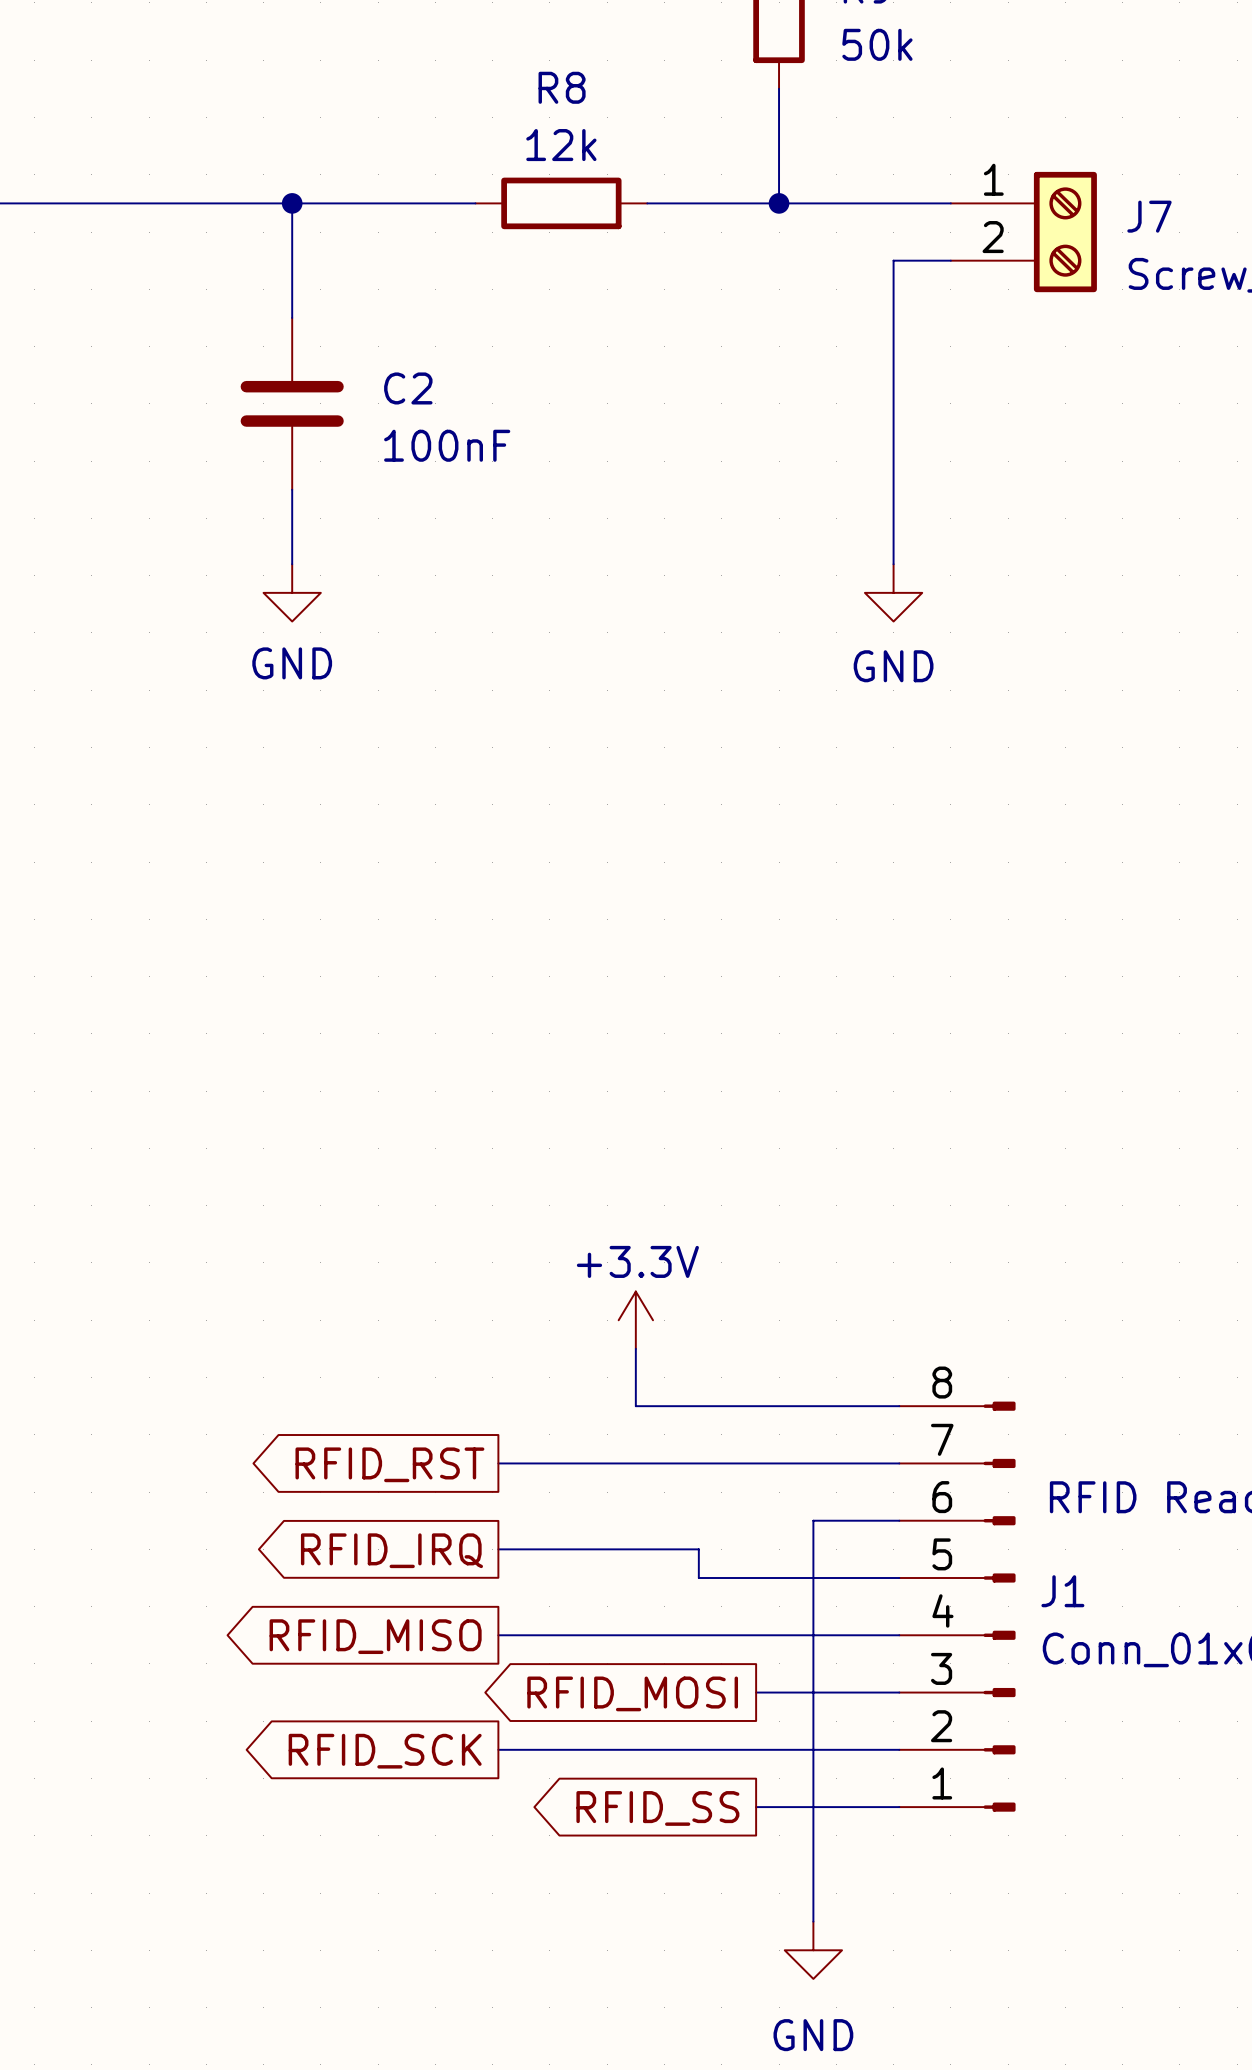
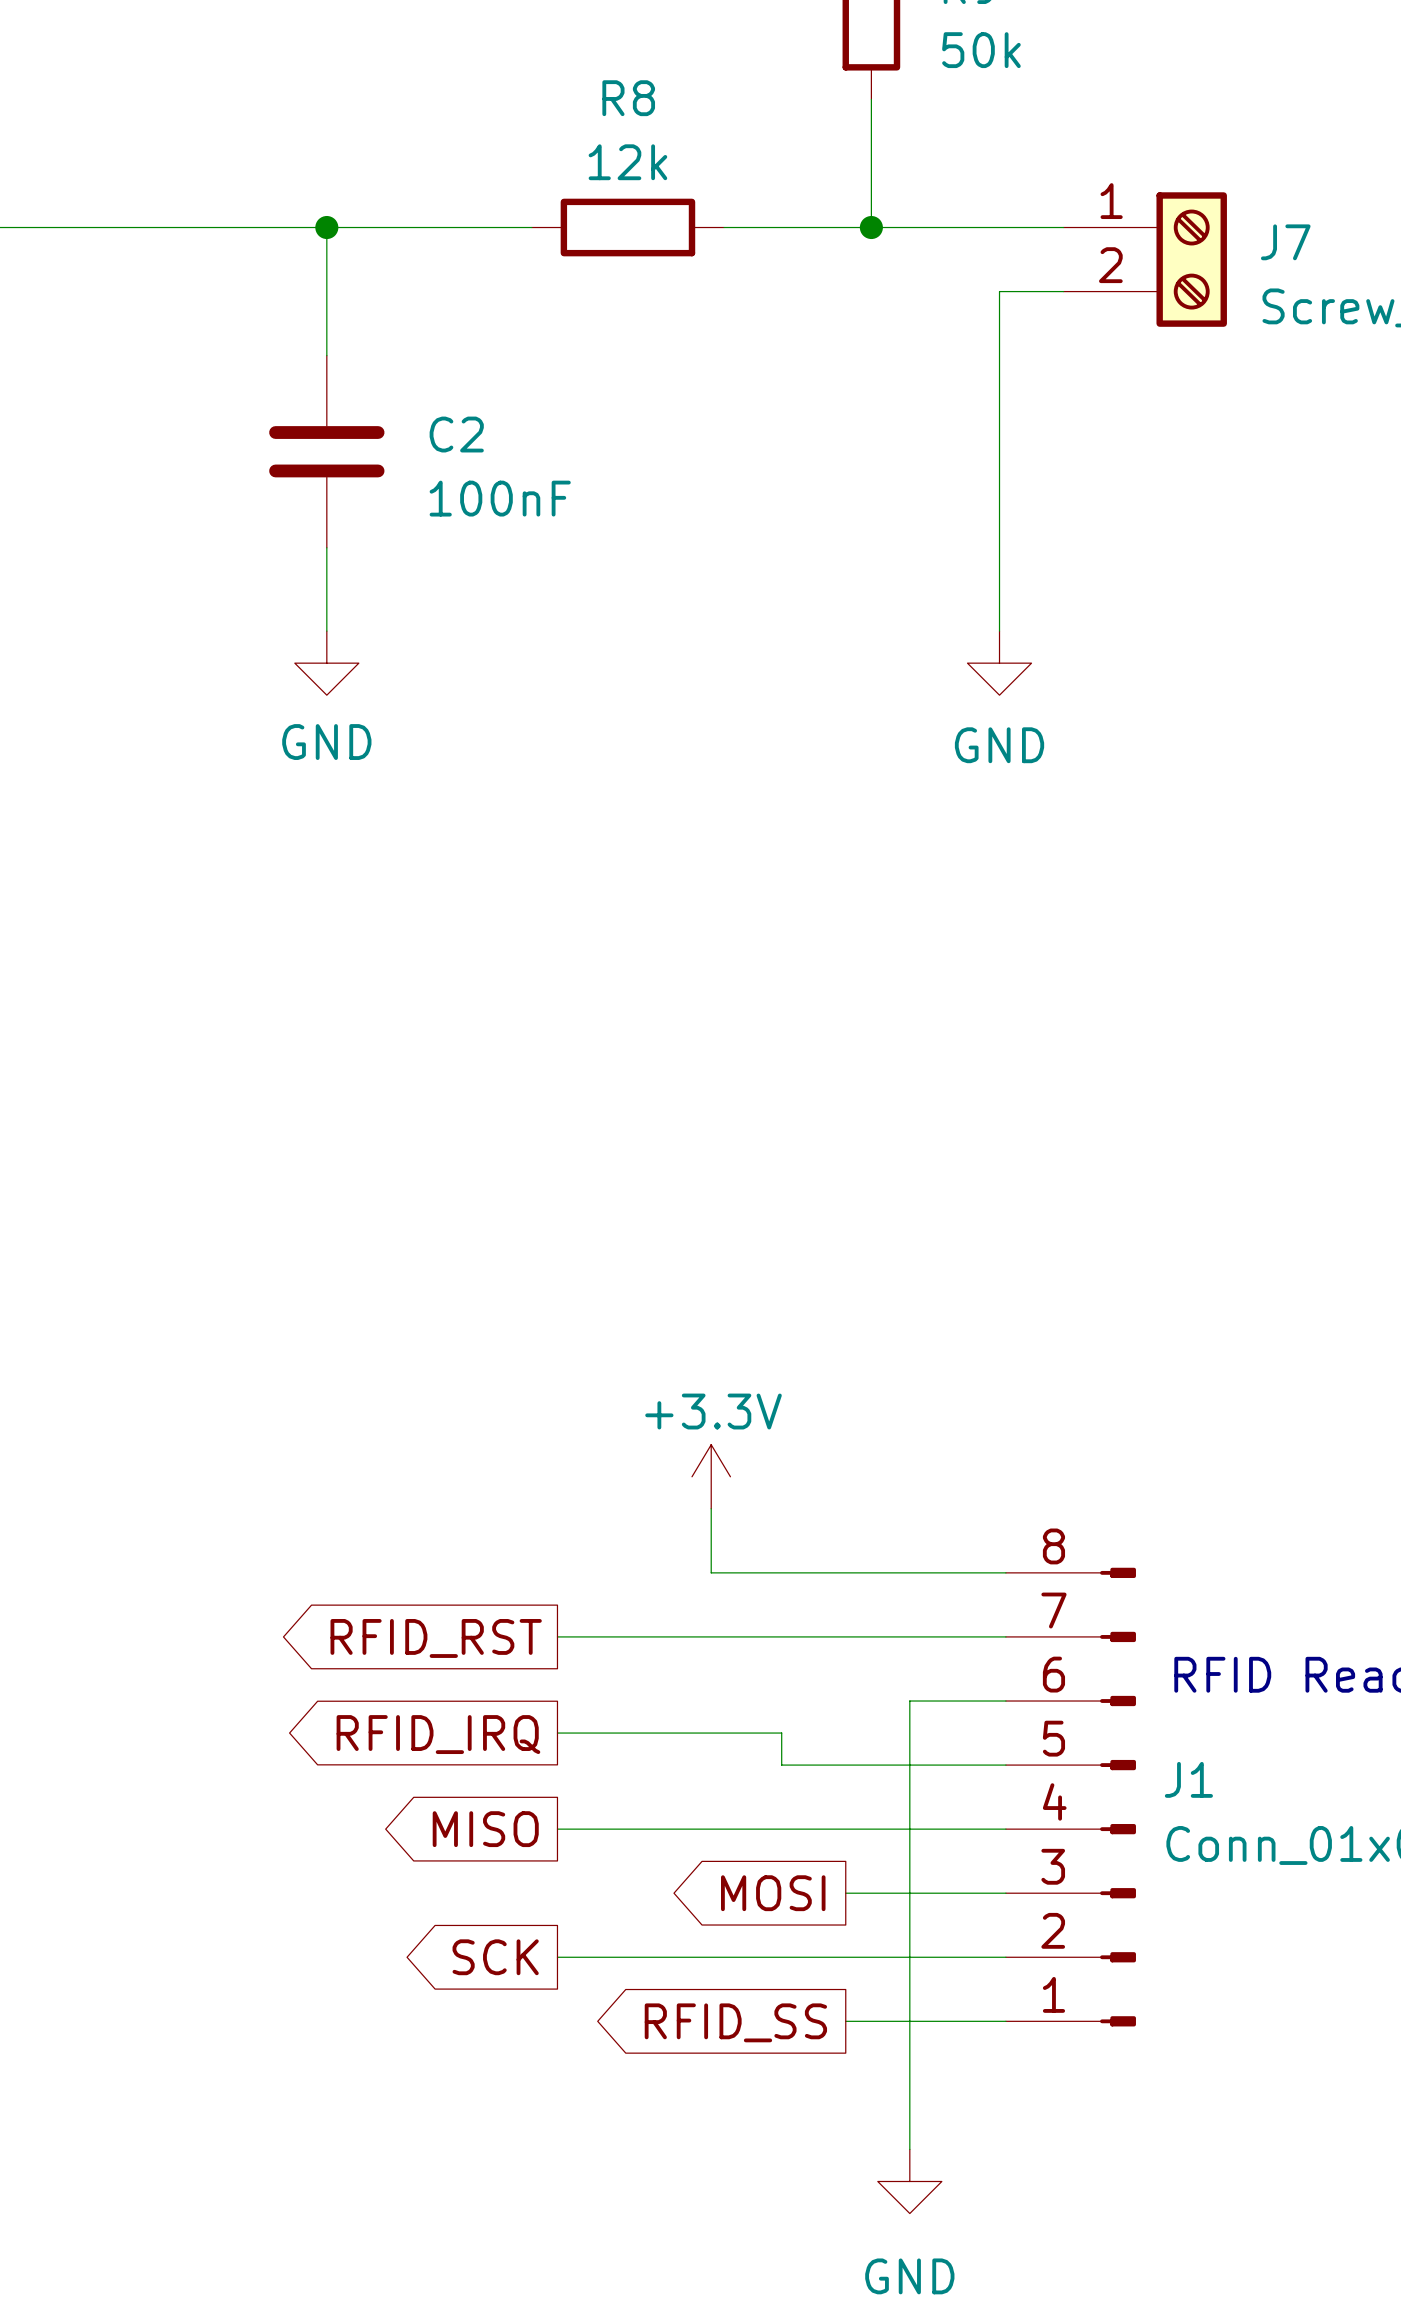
global label: RFID_MISO (375, 1636) -> MISO (485, 1829)
global label: RFID_MOSI (632, 1693) -> MOSI (773, 1893)
global label: RFID_SCK (385, 1751) -> SCK (495, 1957)

